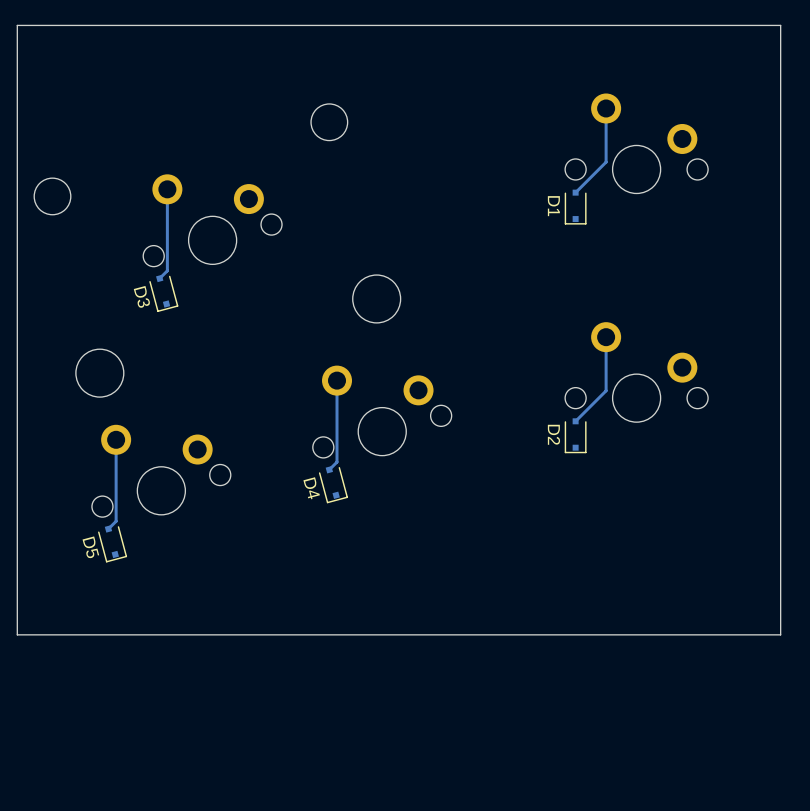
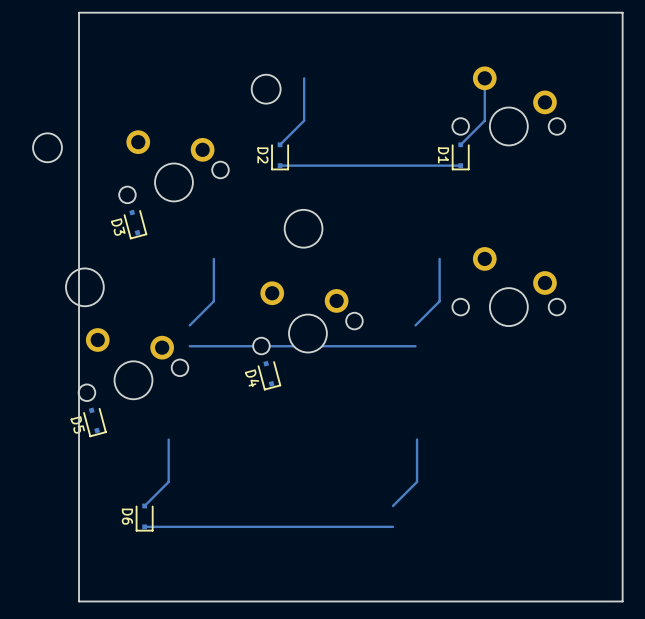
board edge: (92, 25) (17, 25) (17, 634) (780, 634) -> (79, 12) (79, 601) (622, 601) (622, 494)
track: none -> (304, 78) (304, 120) (280, 144)
track: (167, 189) (167, 270) (159, 278) -> none
track: none -> (460, 165) (280, 165)
track: none -> (213, 258) (213, 301) (189, 325)
track: (606, 337) (606, 390) (575, 421) -> (439, 258) (439, 301) (415, 325)
track: (337, 380) (337, 462) (329, 469) -> none
D2 position: (575, 435) -> (280, 156)
track: (116, 439) (116, 521) (108, 528) -> none
track: none -> (415, 346) (189, 346)
track: none -> (168, 439) (168, 481) (144, 505)
track: none -> (417, 439) (417, 481) (392, 505)
D6: none -> (144, 517)
track: none -> (392, 526) (144, 526)

